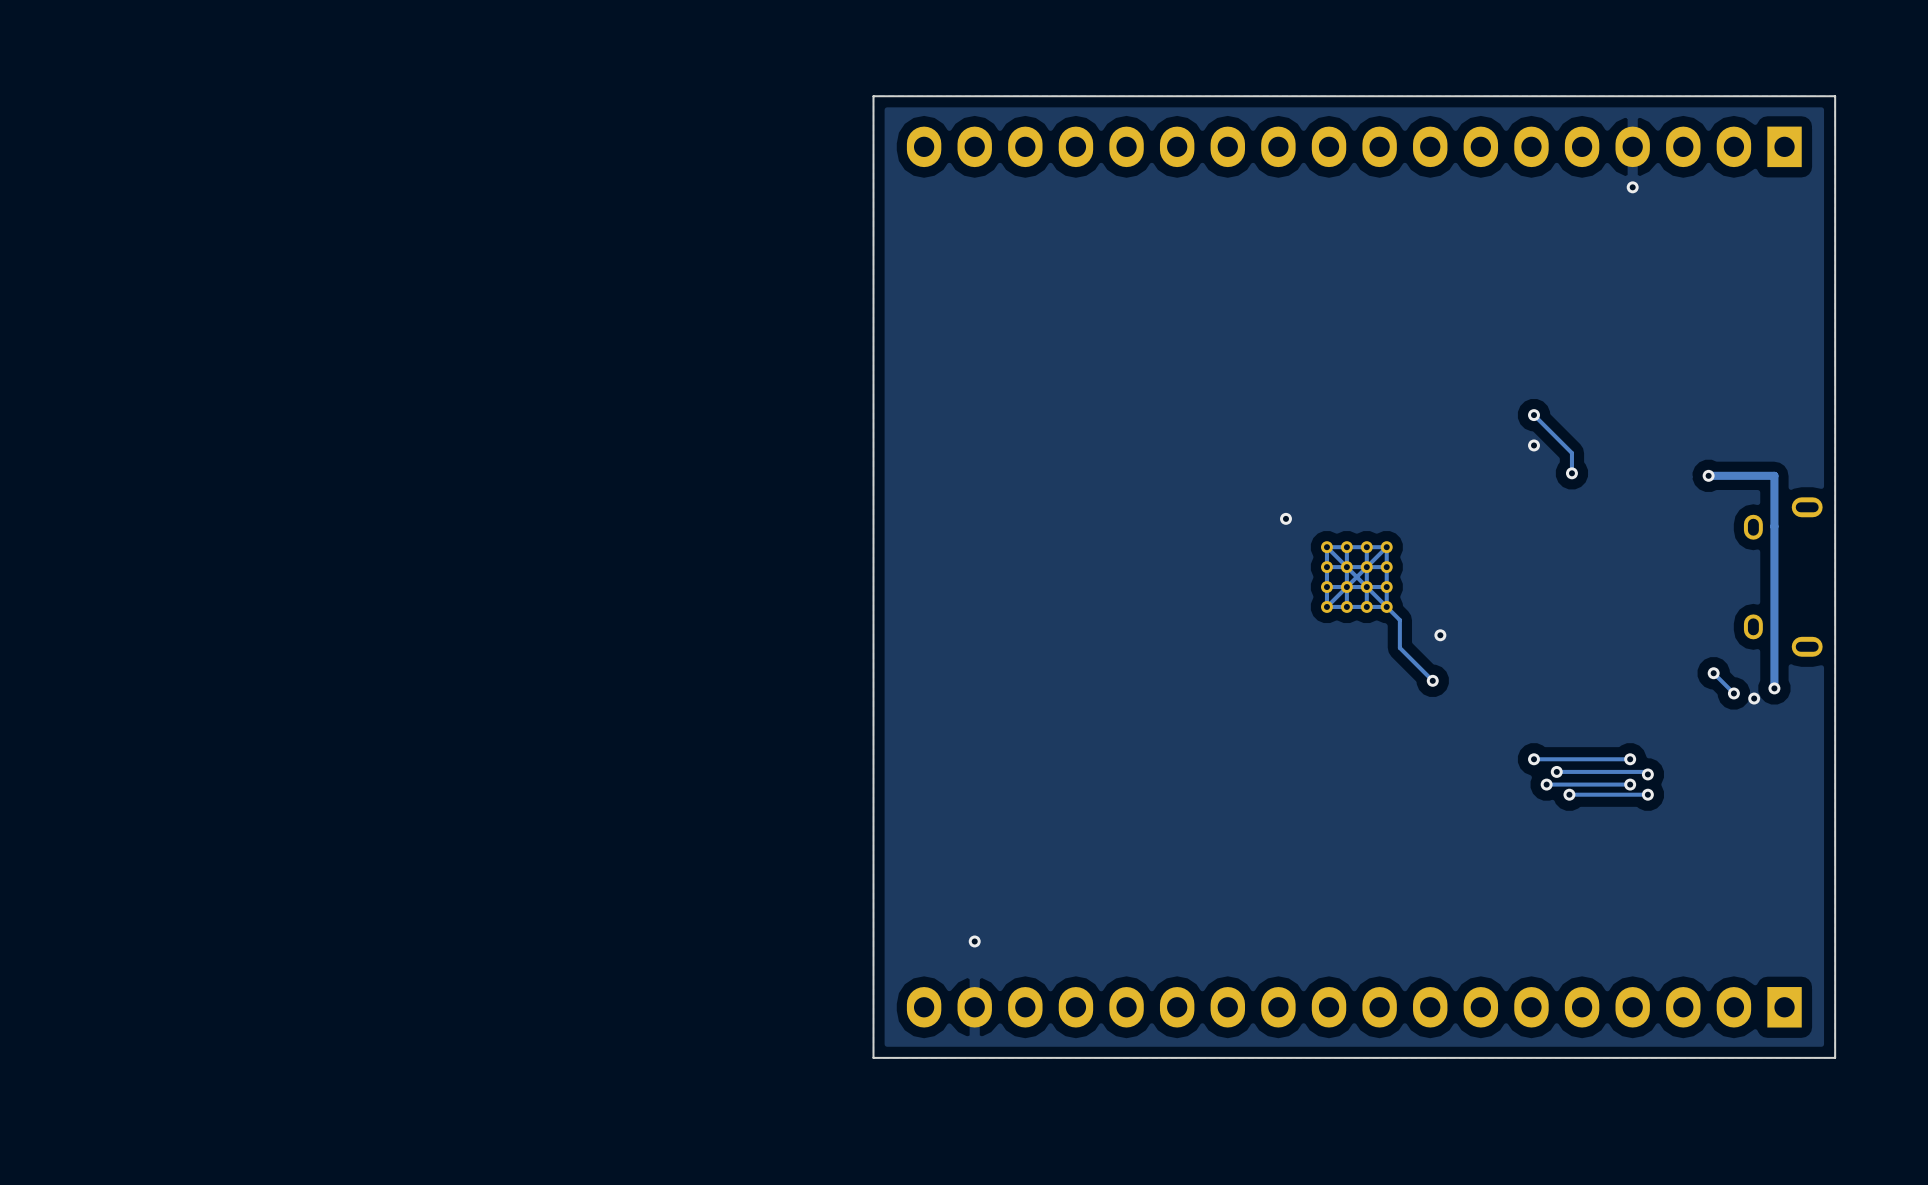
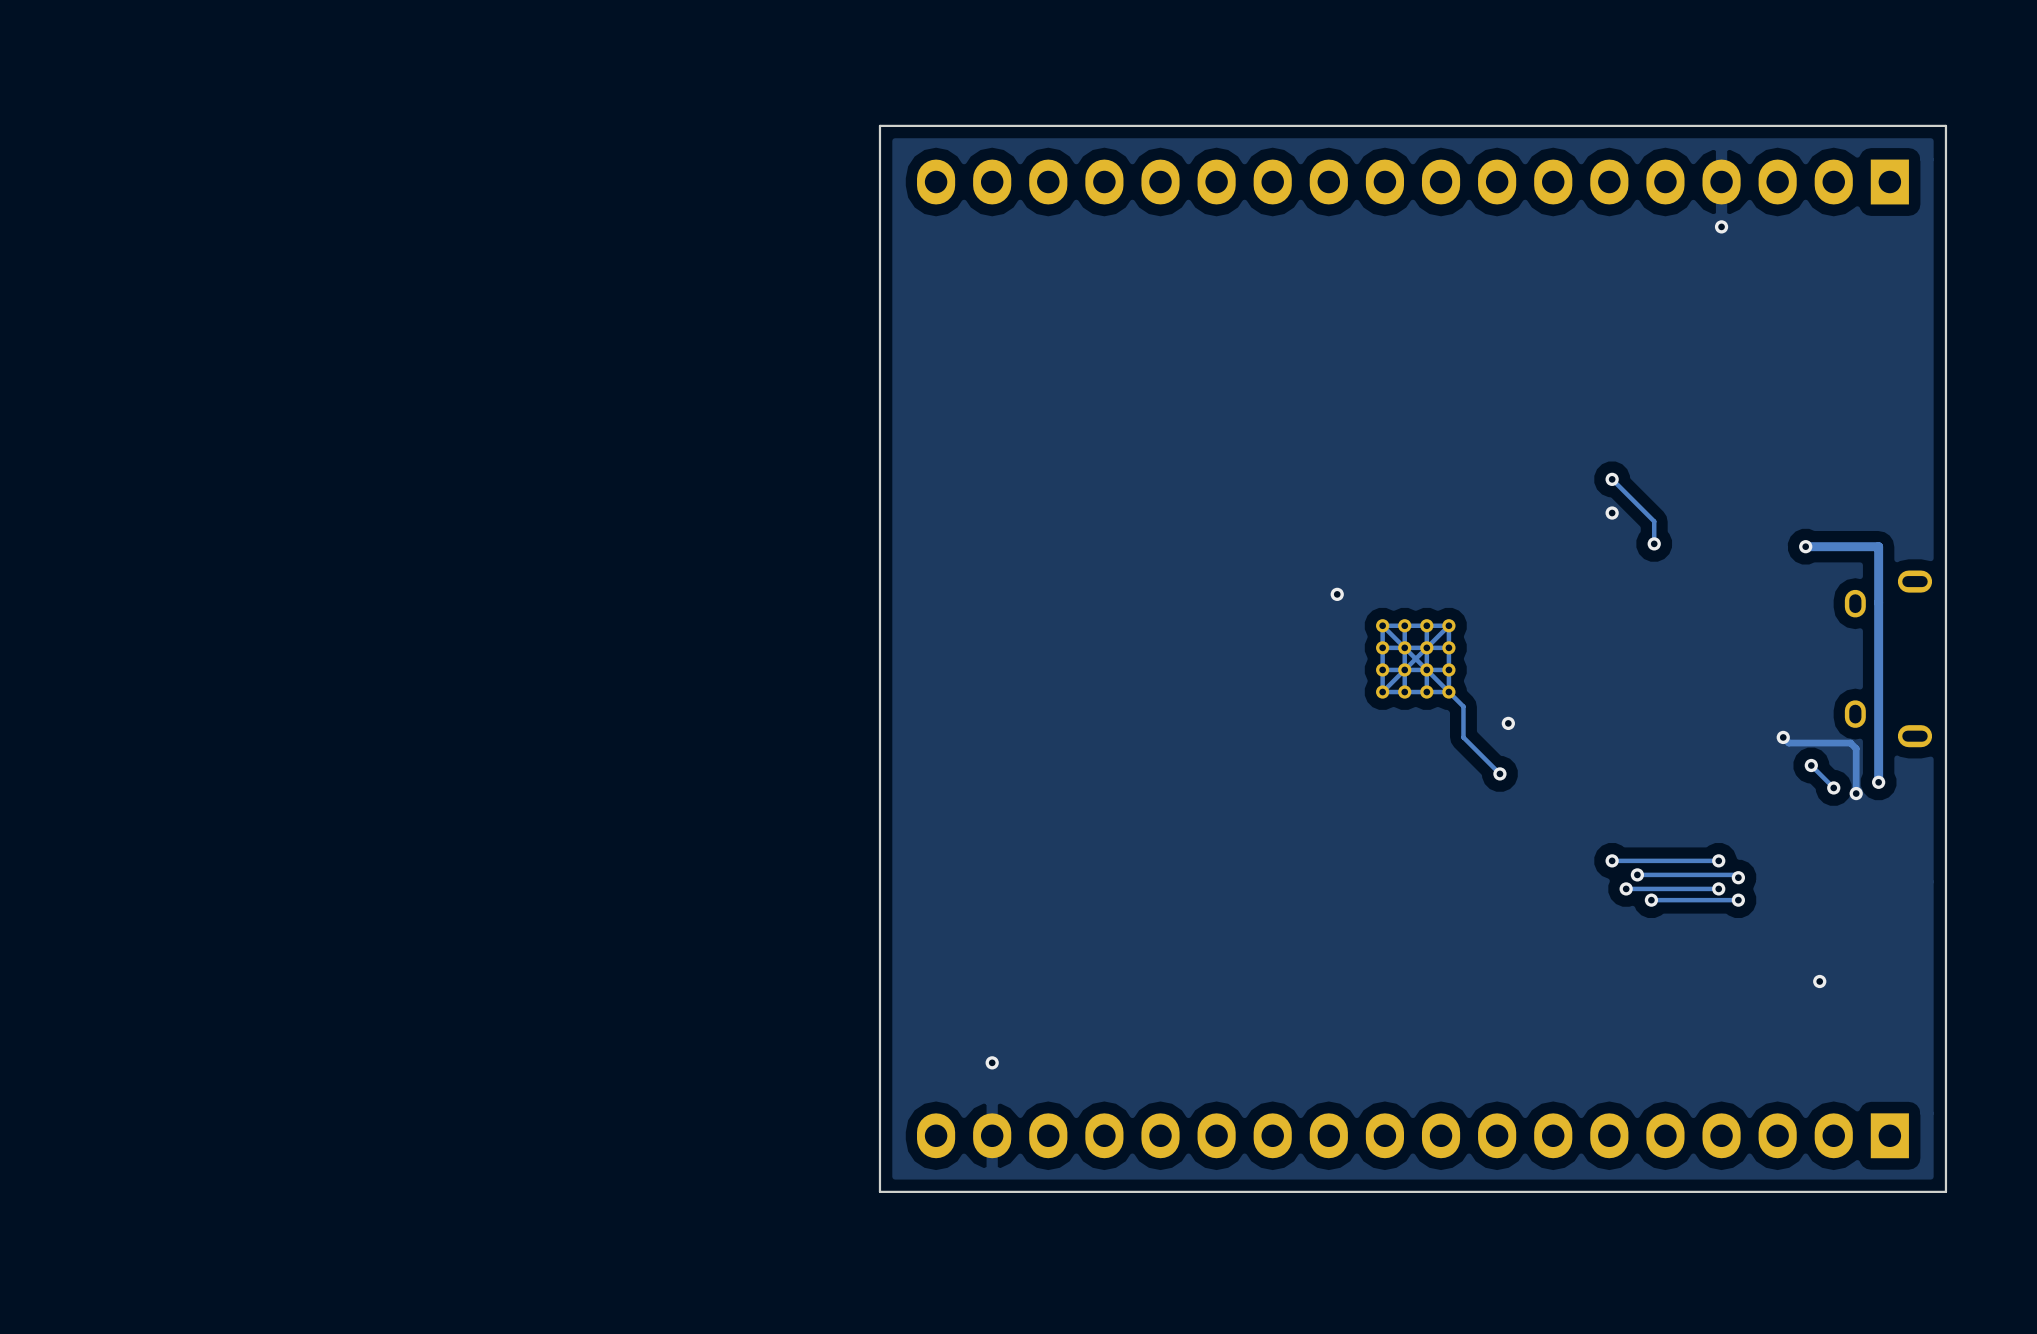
track: none -> (1783, 737) (1788, 743) (1850, 743) (1856, 748) (1856, 793)
via: none -> (1783, 737)
via: none -> (1819, 981)

